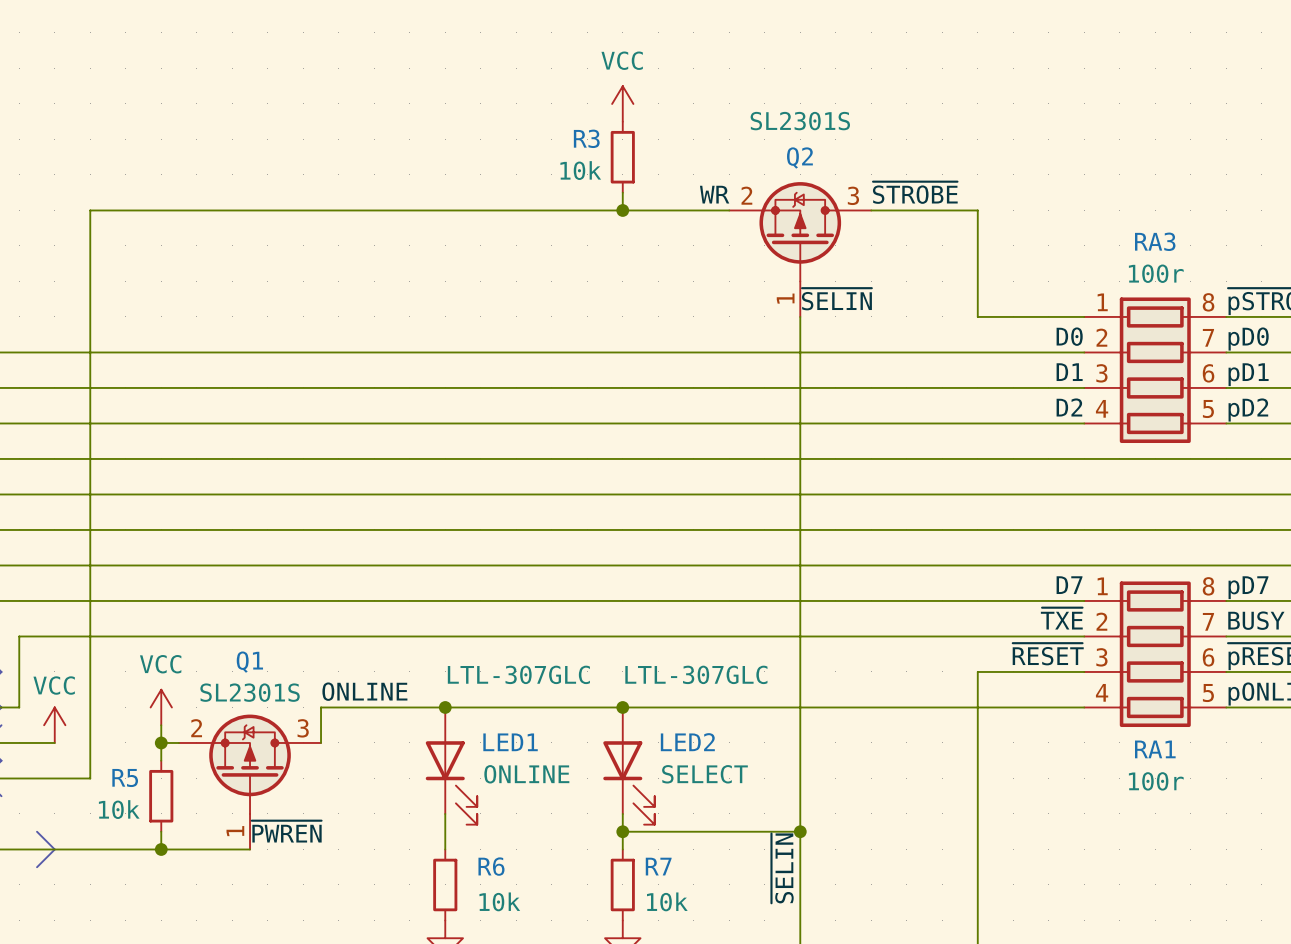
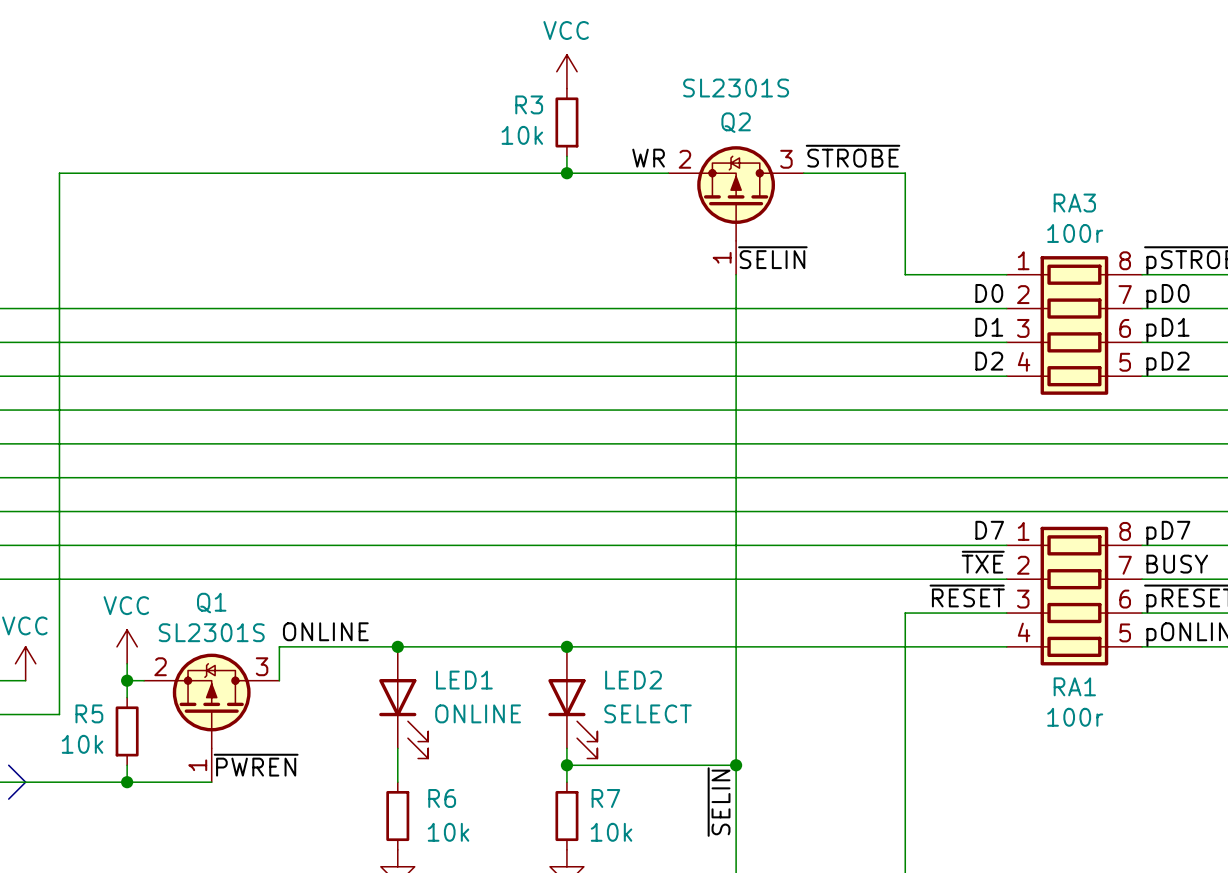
LED1 value: LTL-307GLC (518, 674) -> ONLINE (478, 713)
LED2 value: LTL-307GLC (696, 674) -> SELECT (648, 713)
LED1 text: ONLINE (526, 774) -> none
LED2 text: SELECT (704, 774) -> none

